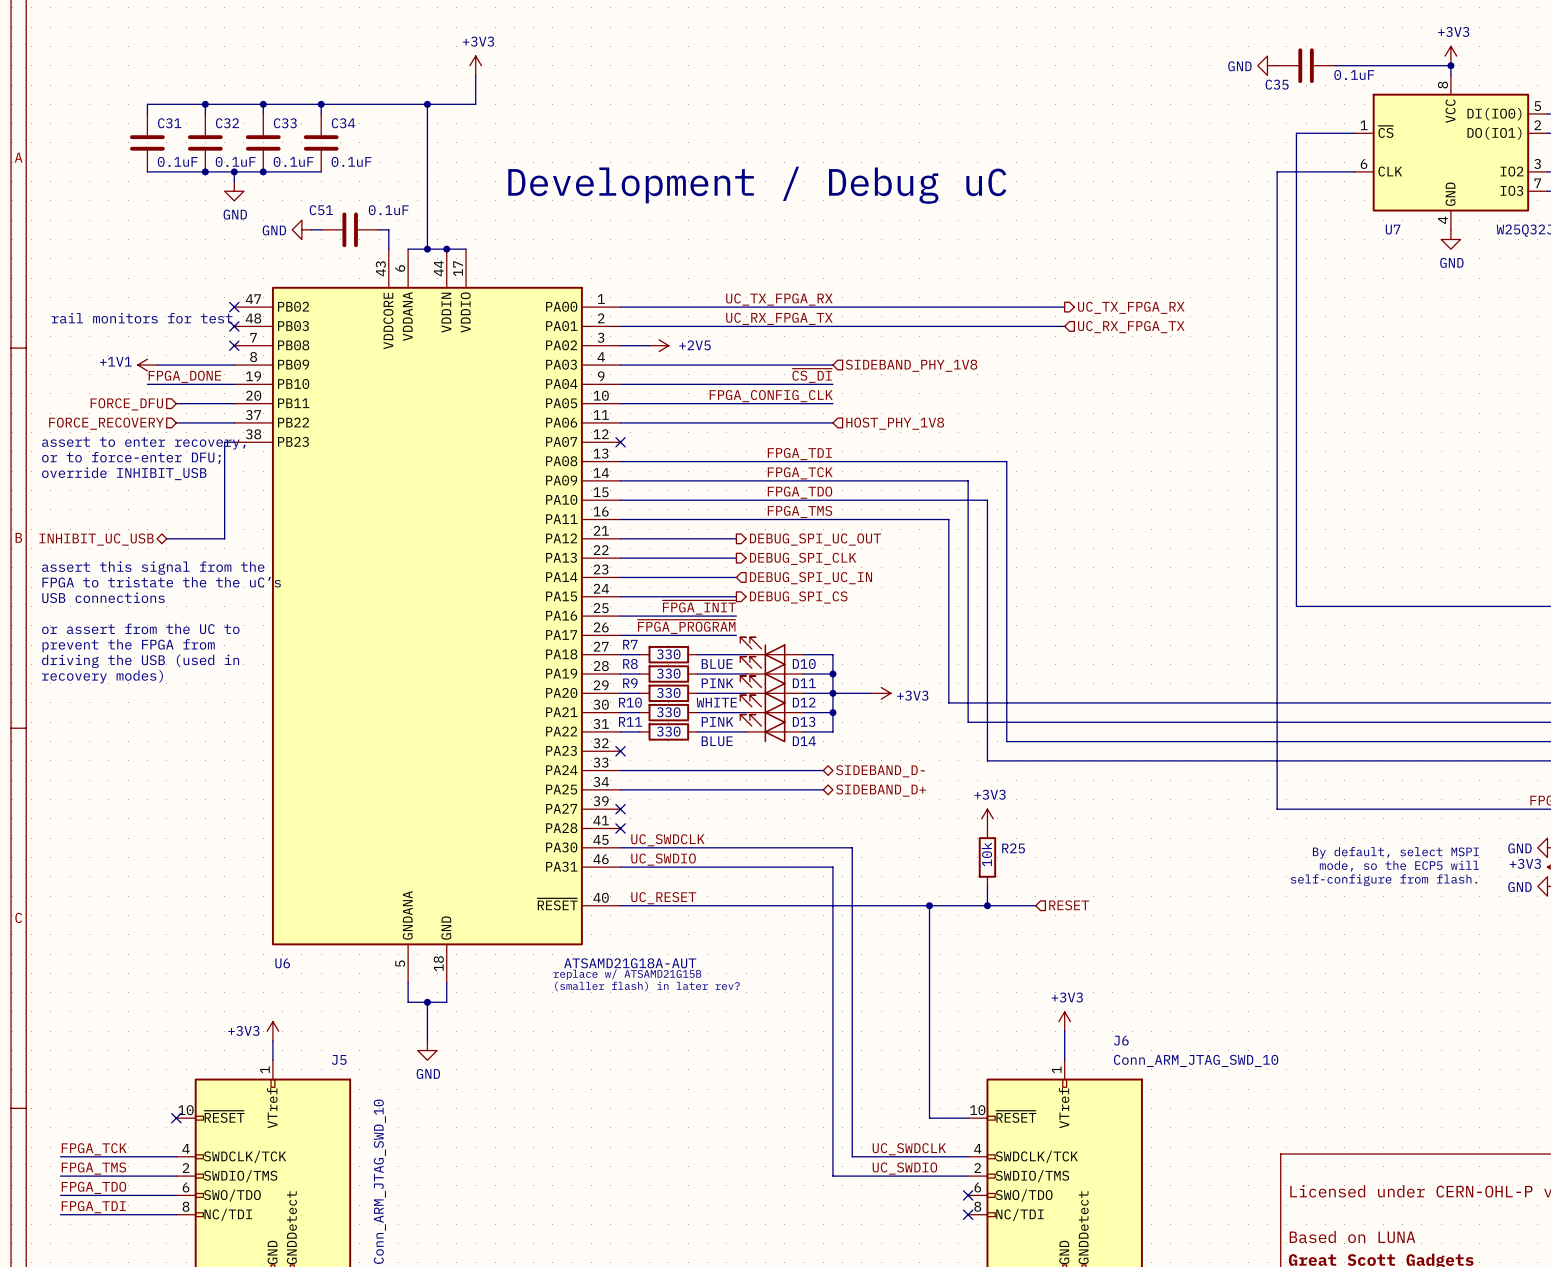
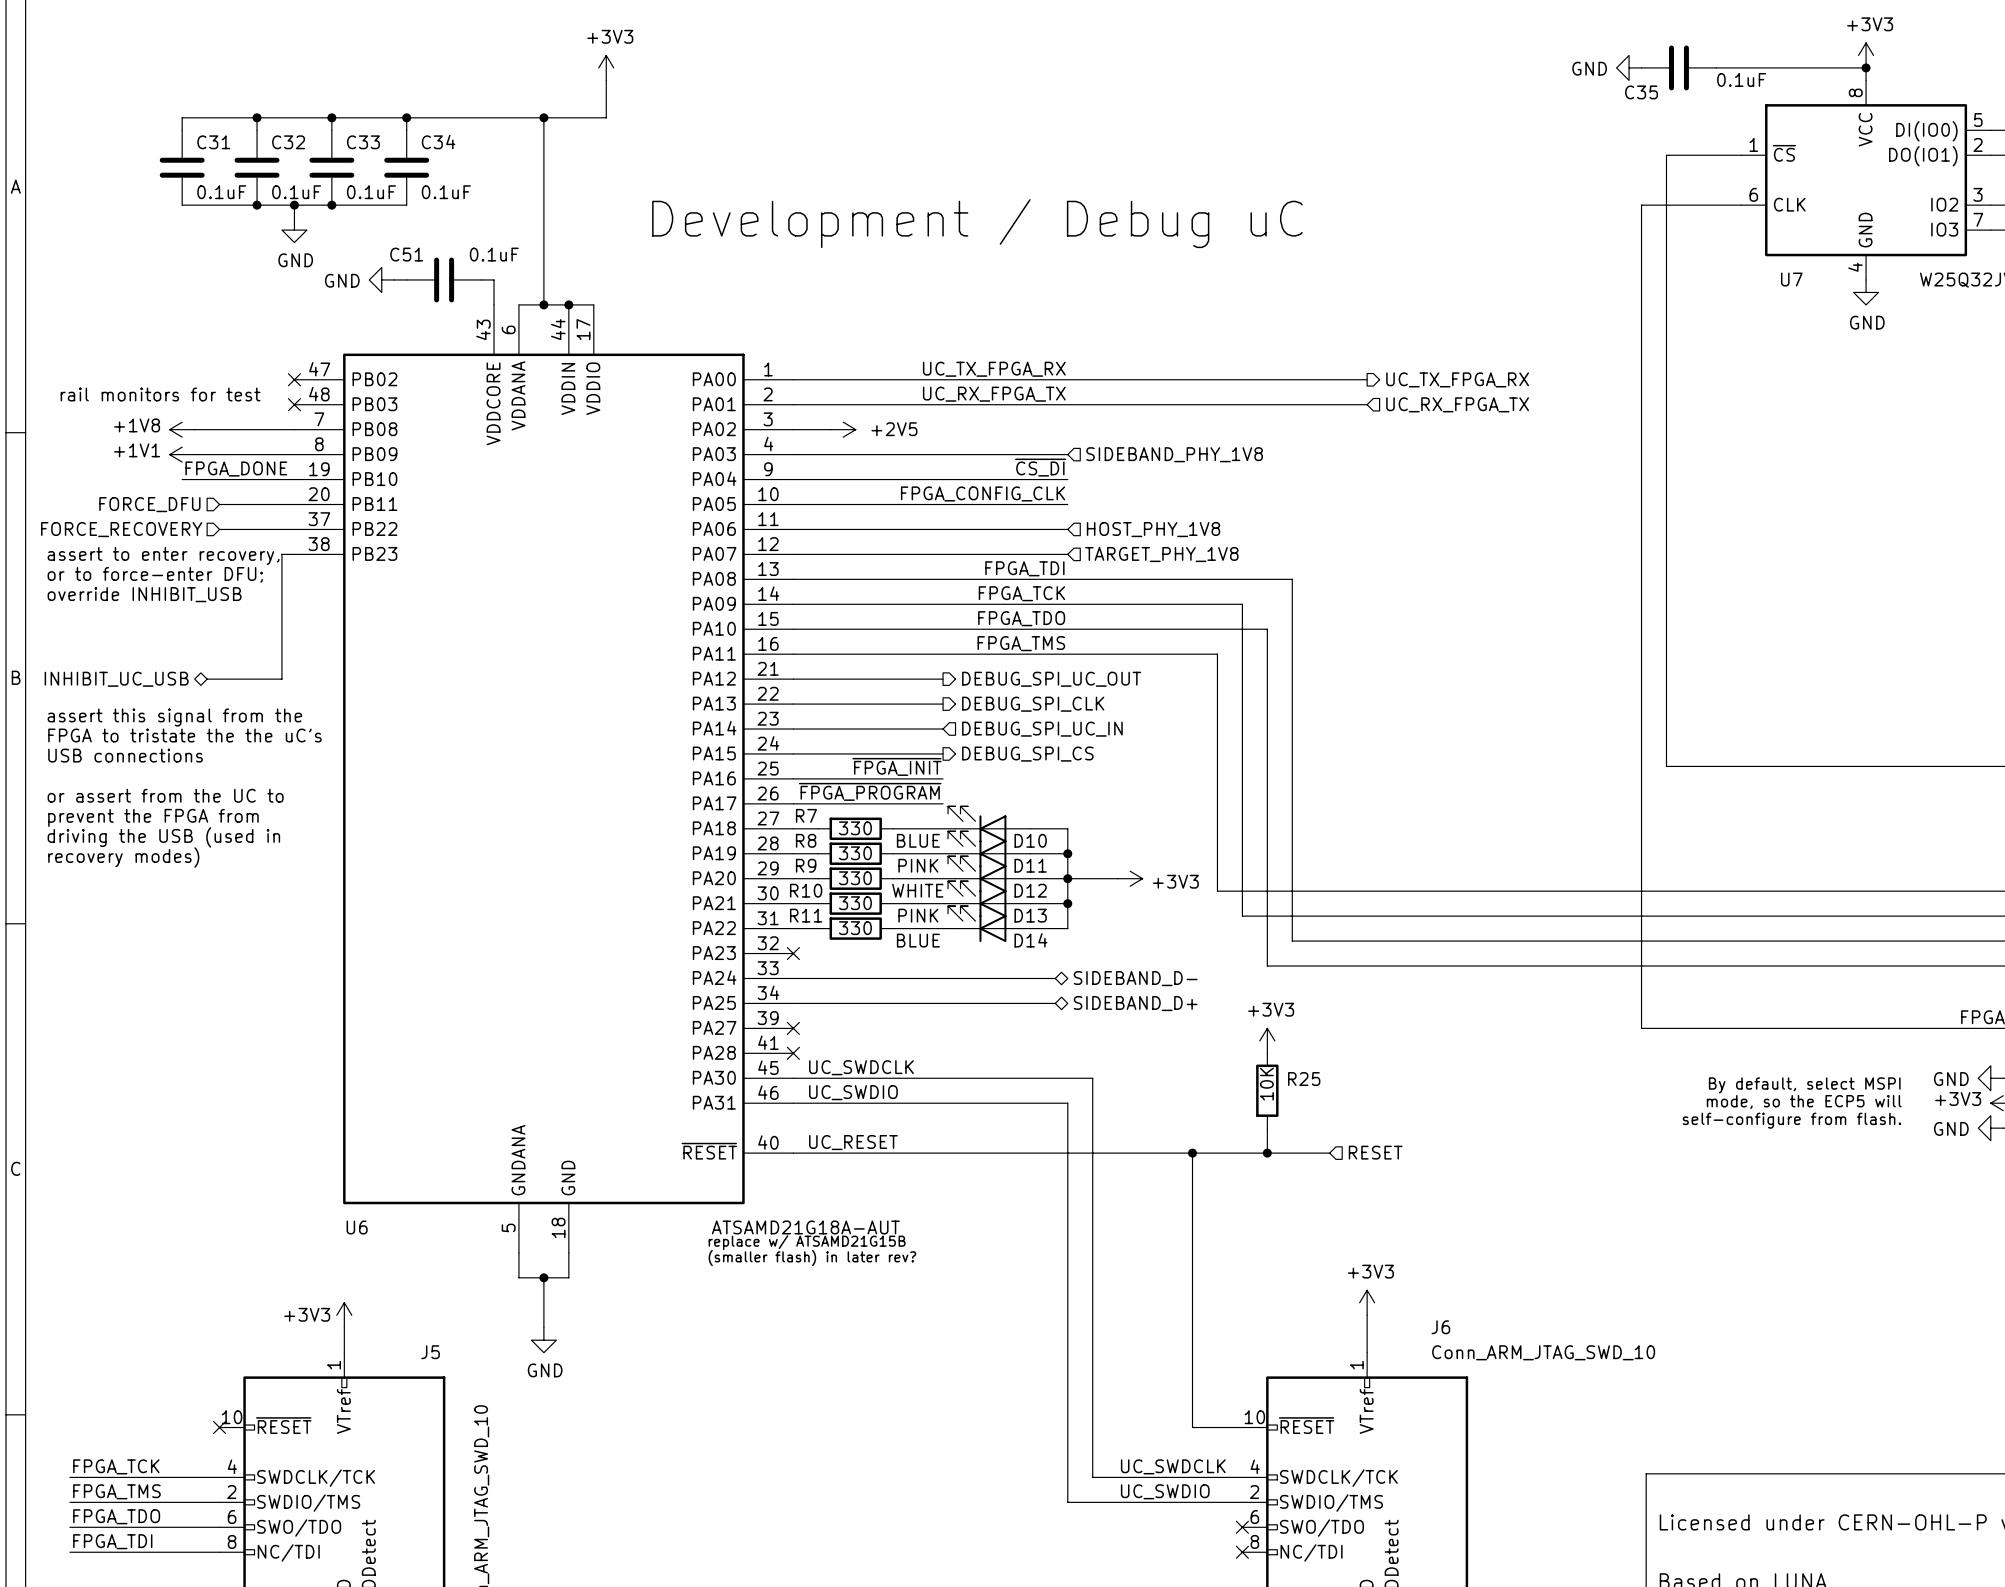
power symbol: none -> +1V8 (182, 429)
wire: none -> (194, 429) (294, 429)
no-connect mark: (234, 345) -> none
wire: none -> (793, 554) (1067, 554)
no-connect mark: (620, 442) -> none
hierarchical label: none -> TARGET_PHY_1V8 (1161, 554)
R25 value: 10k (986, 854) -> 10K (1266, 1084)

